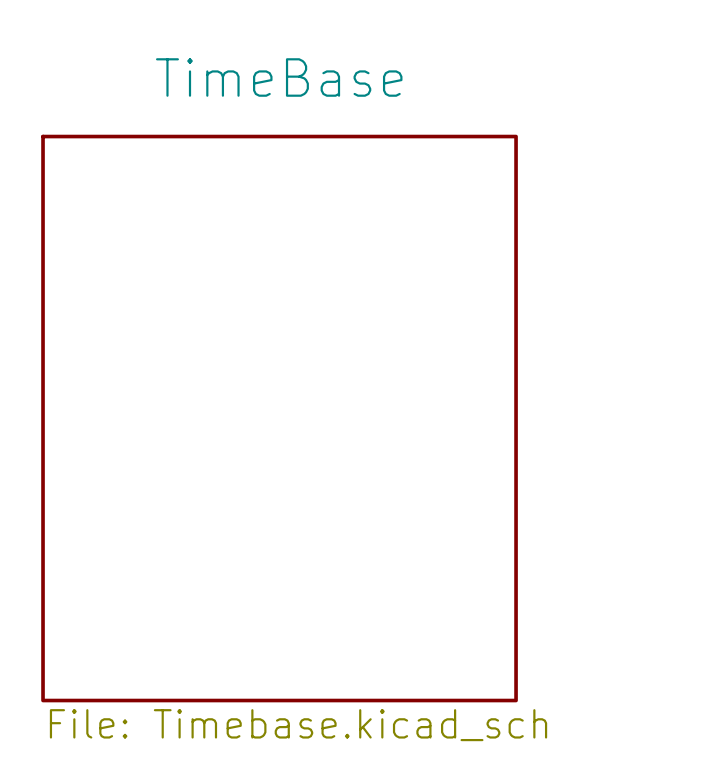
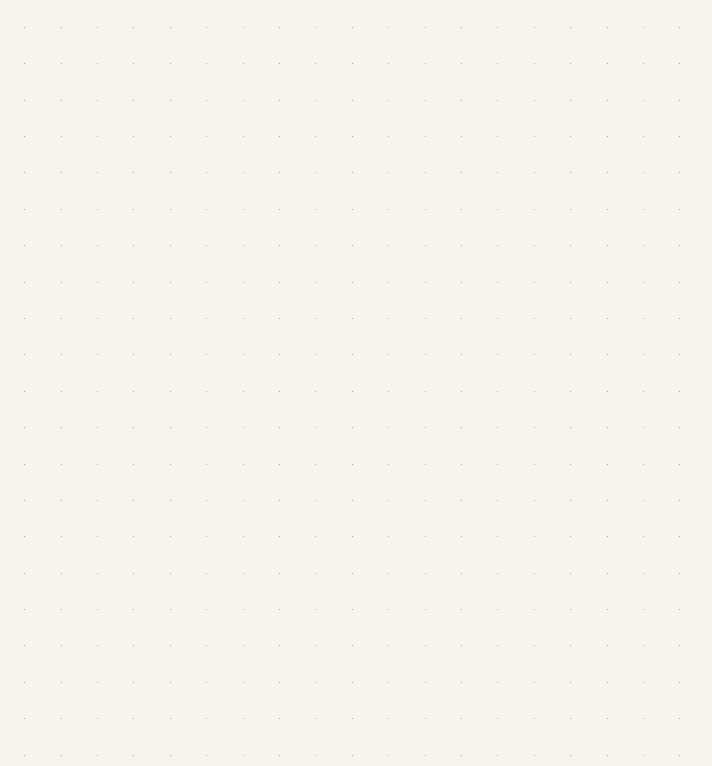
sheet TimeBase: File: Timebase.kicad_sch (279, 418) -> none

